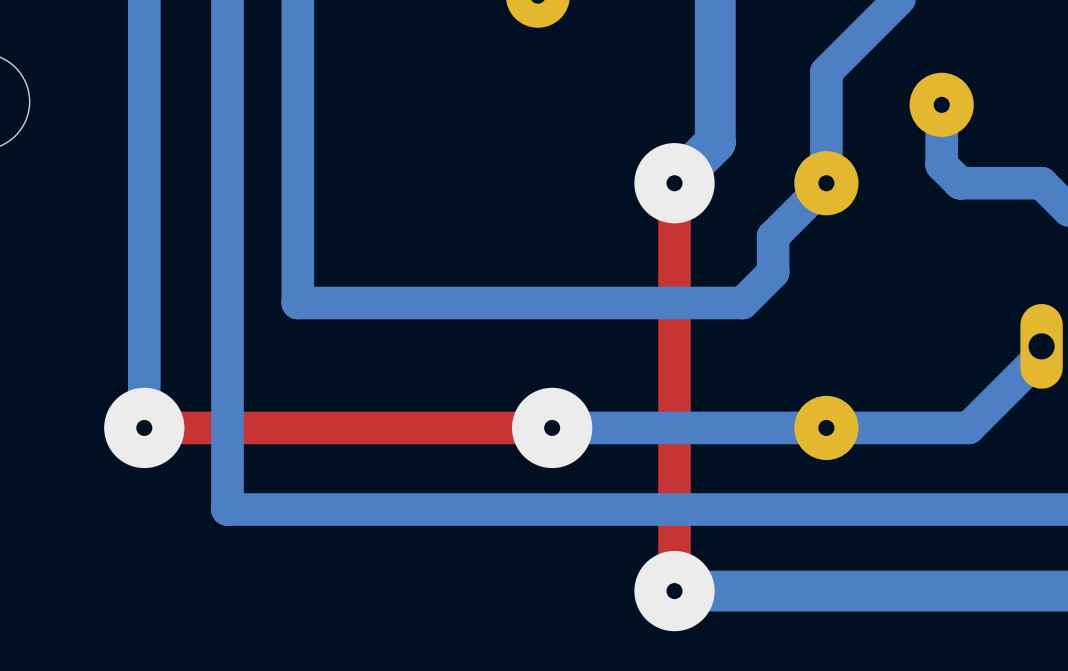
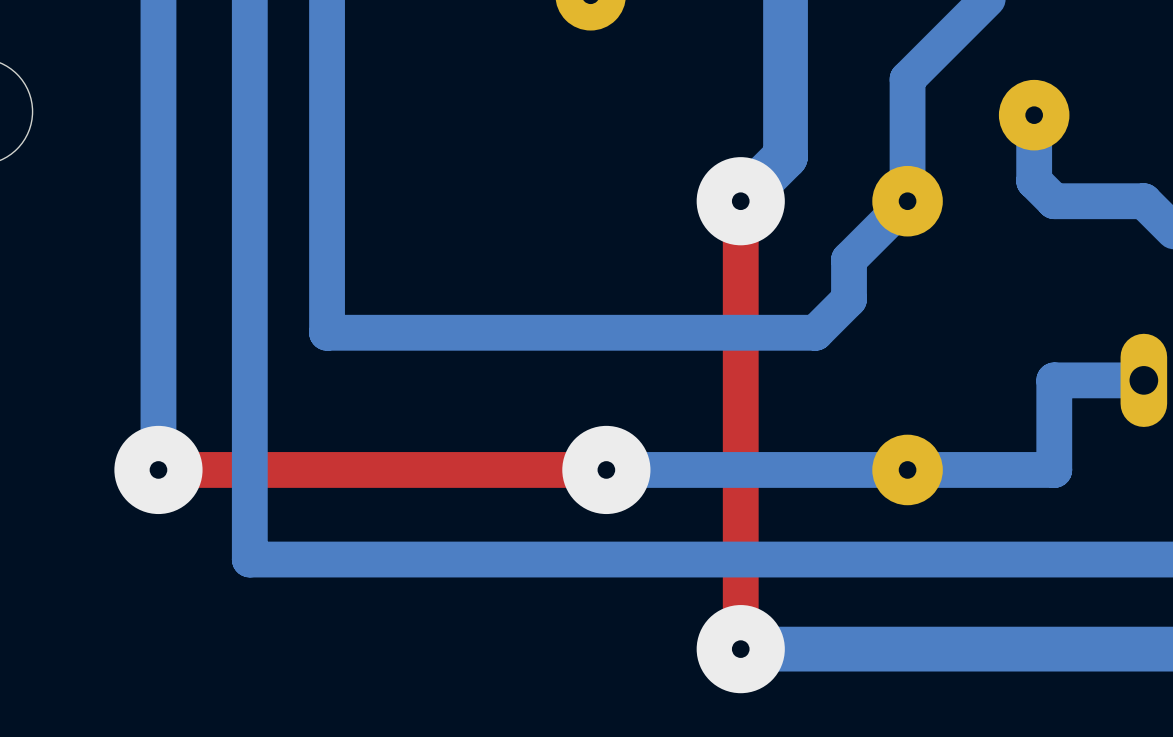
bottom track: (1041, 346) (1041, 355) (968, 427) (960, 427) -> (1143, 380) (1054, 380) (1054, 469)

